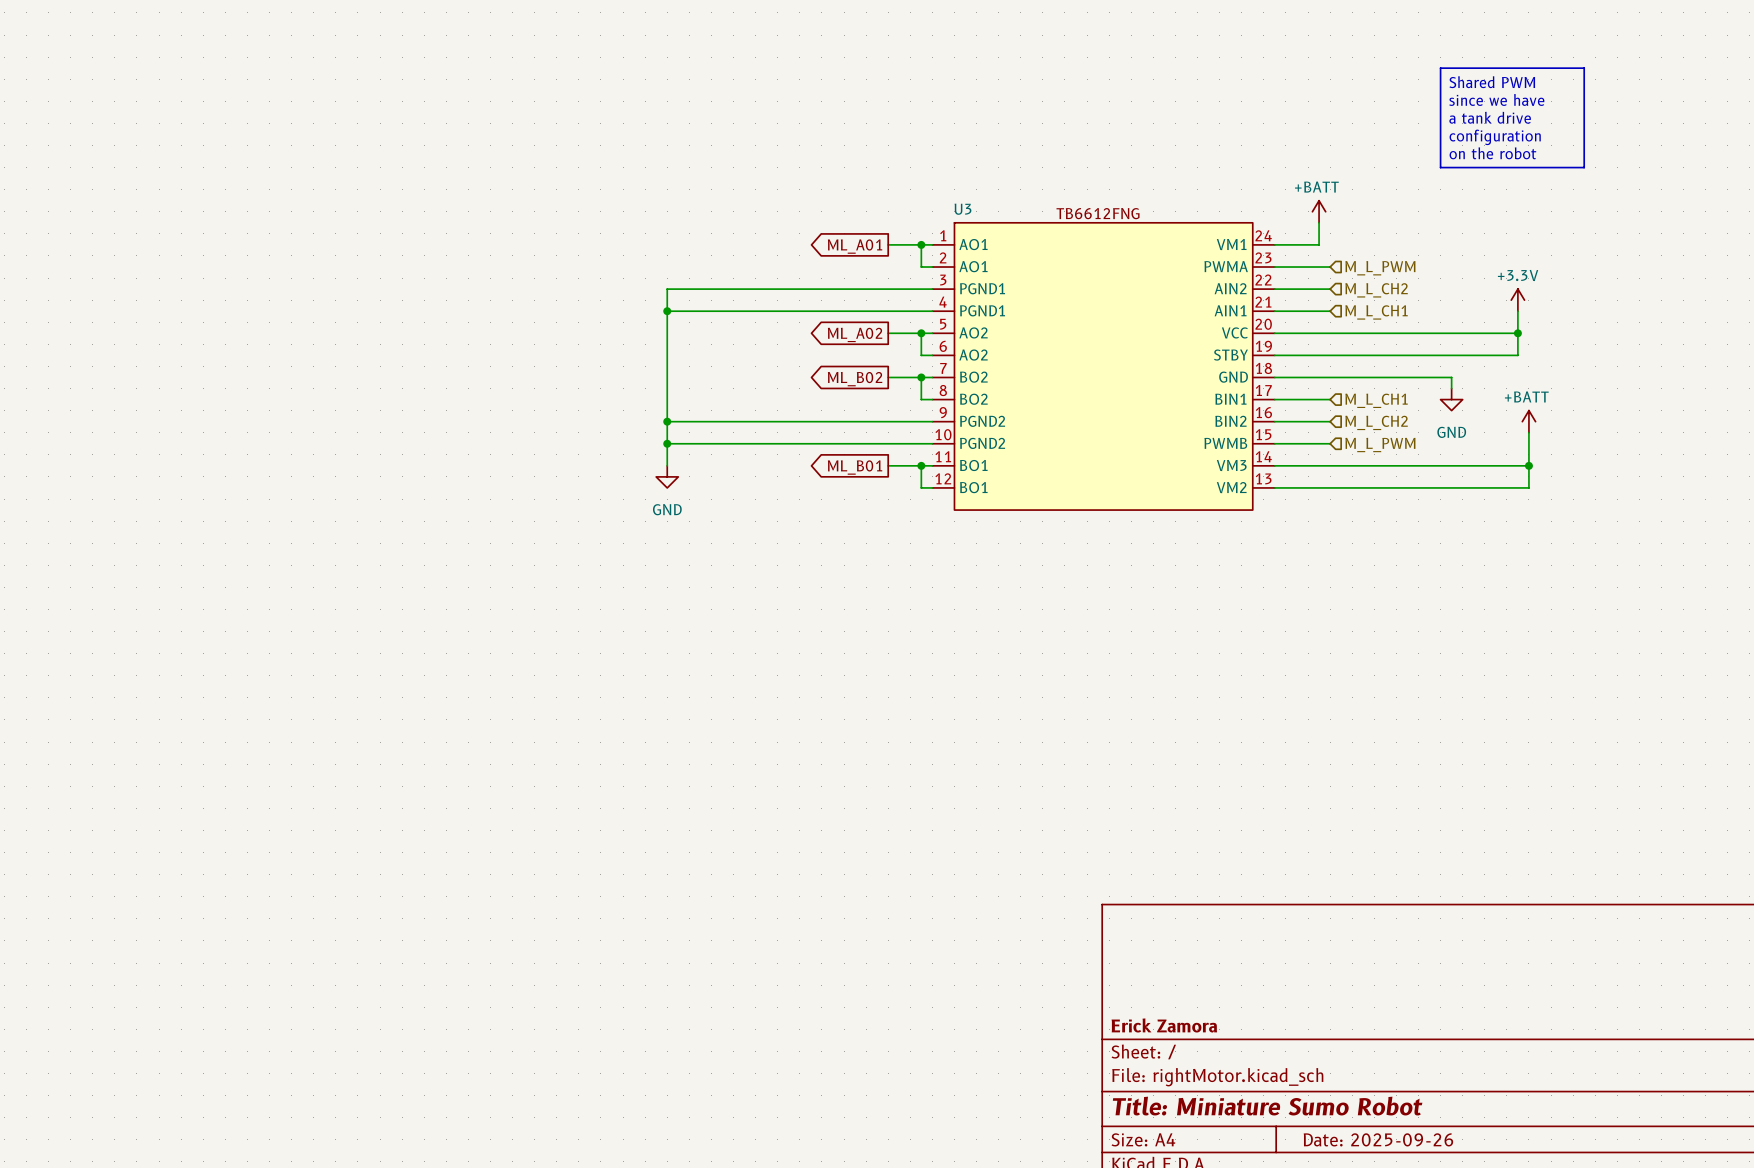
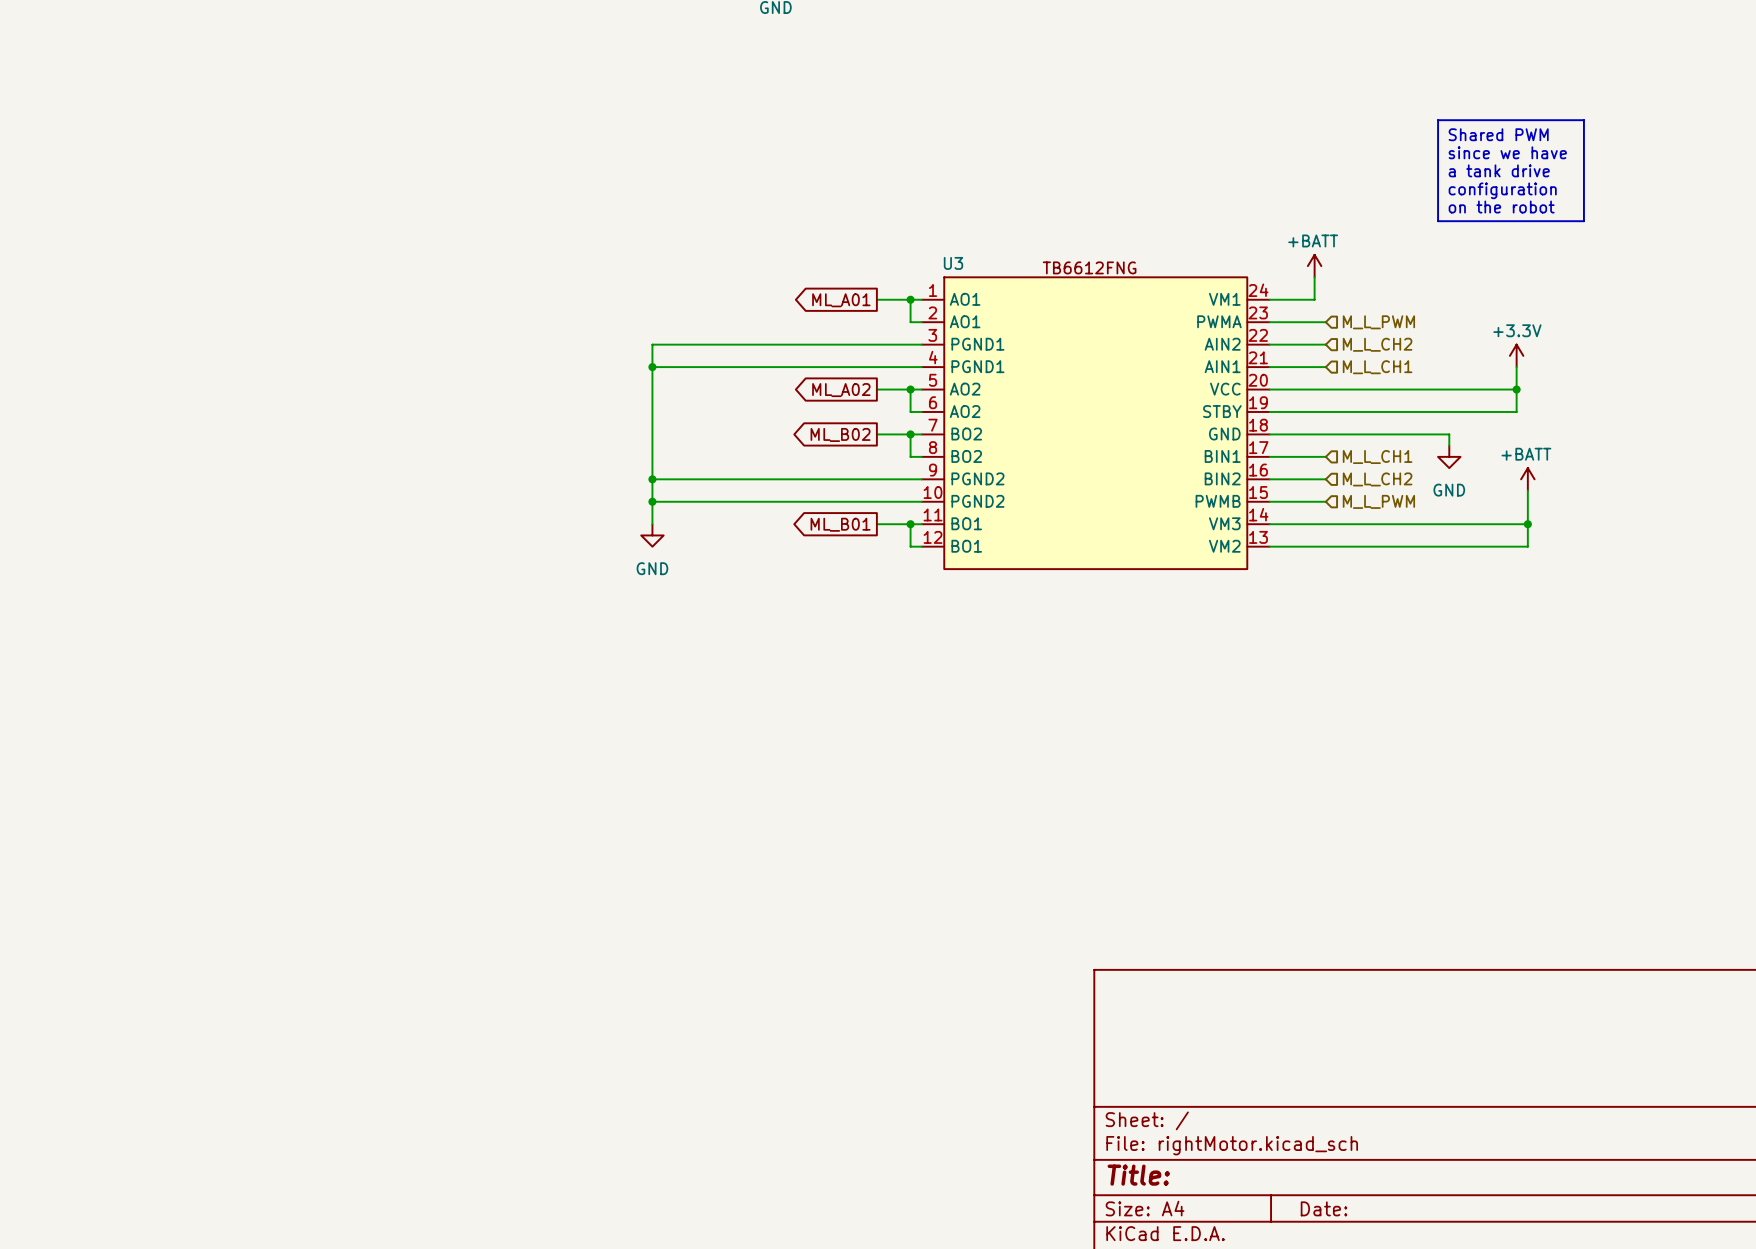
title block: Erick Zamora (1164, 1025) -> none
title block: Title: Miniature Sumo Robot (1267, 1106) -> Title: (1138, 1175)
title block: Date: 2025-09-26 (1378, 1139) -> Date: (1324, 1208)

